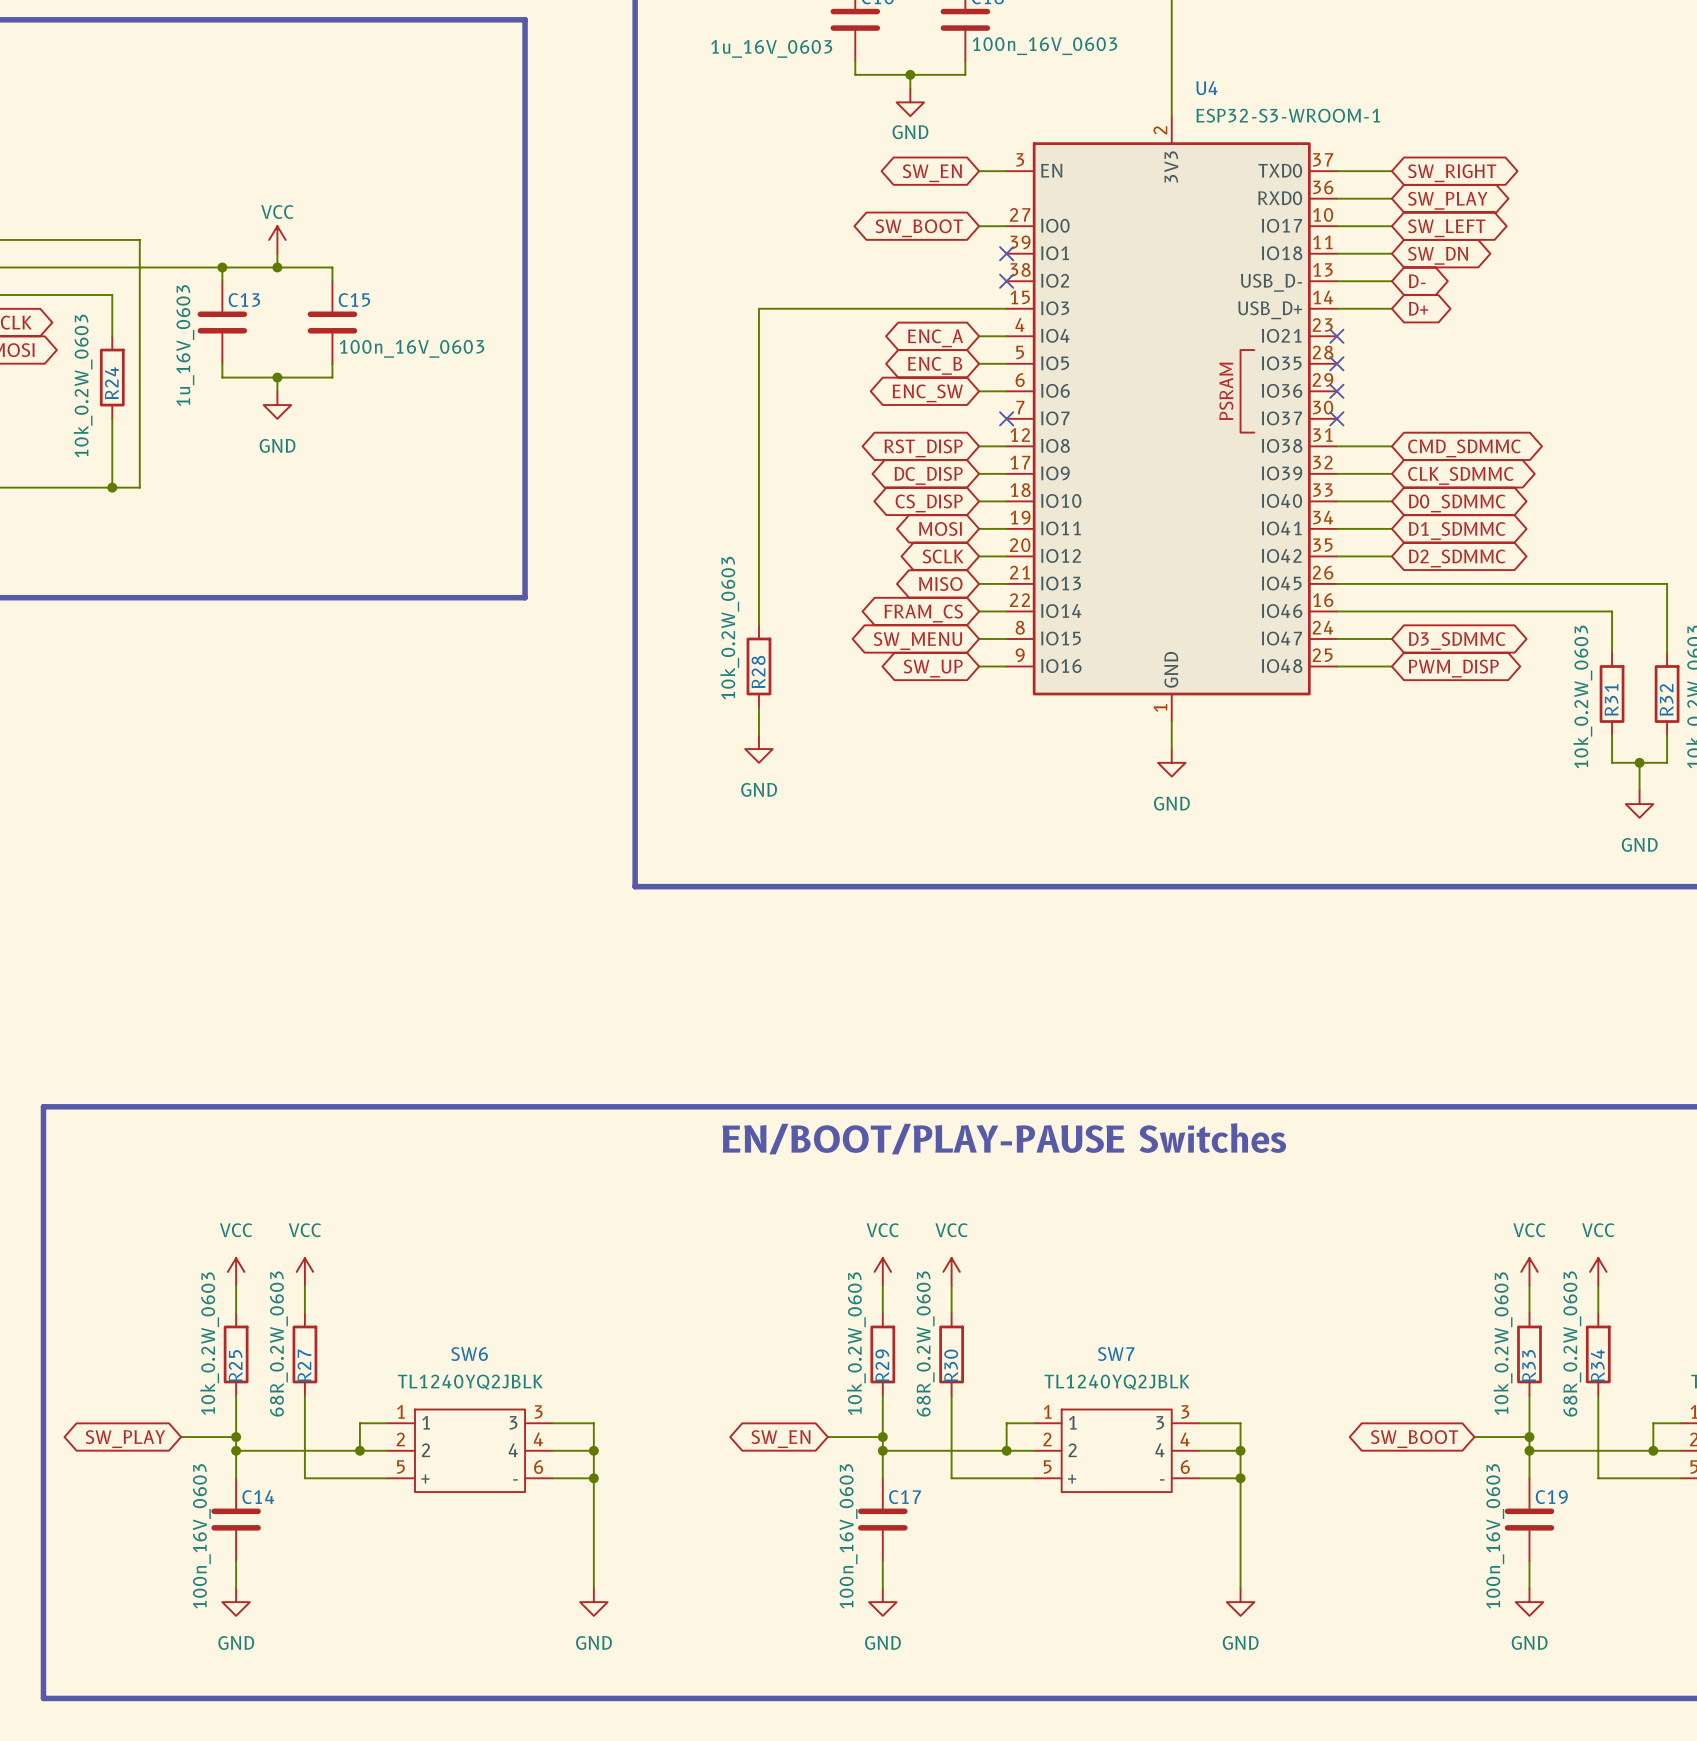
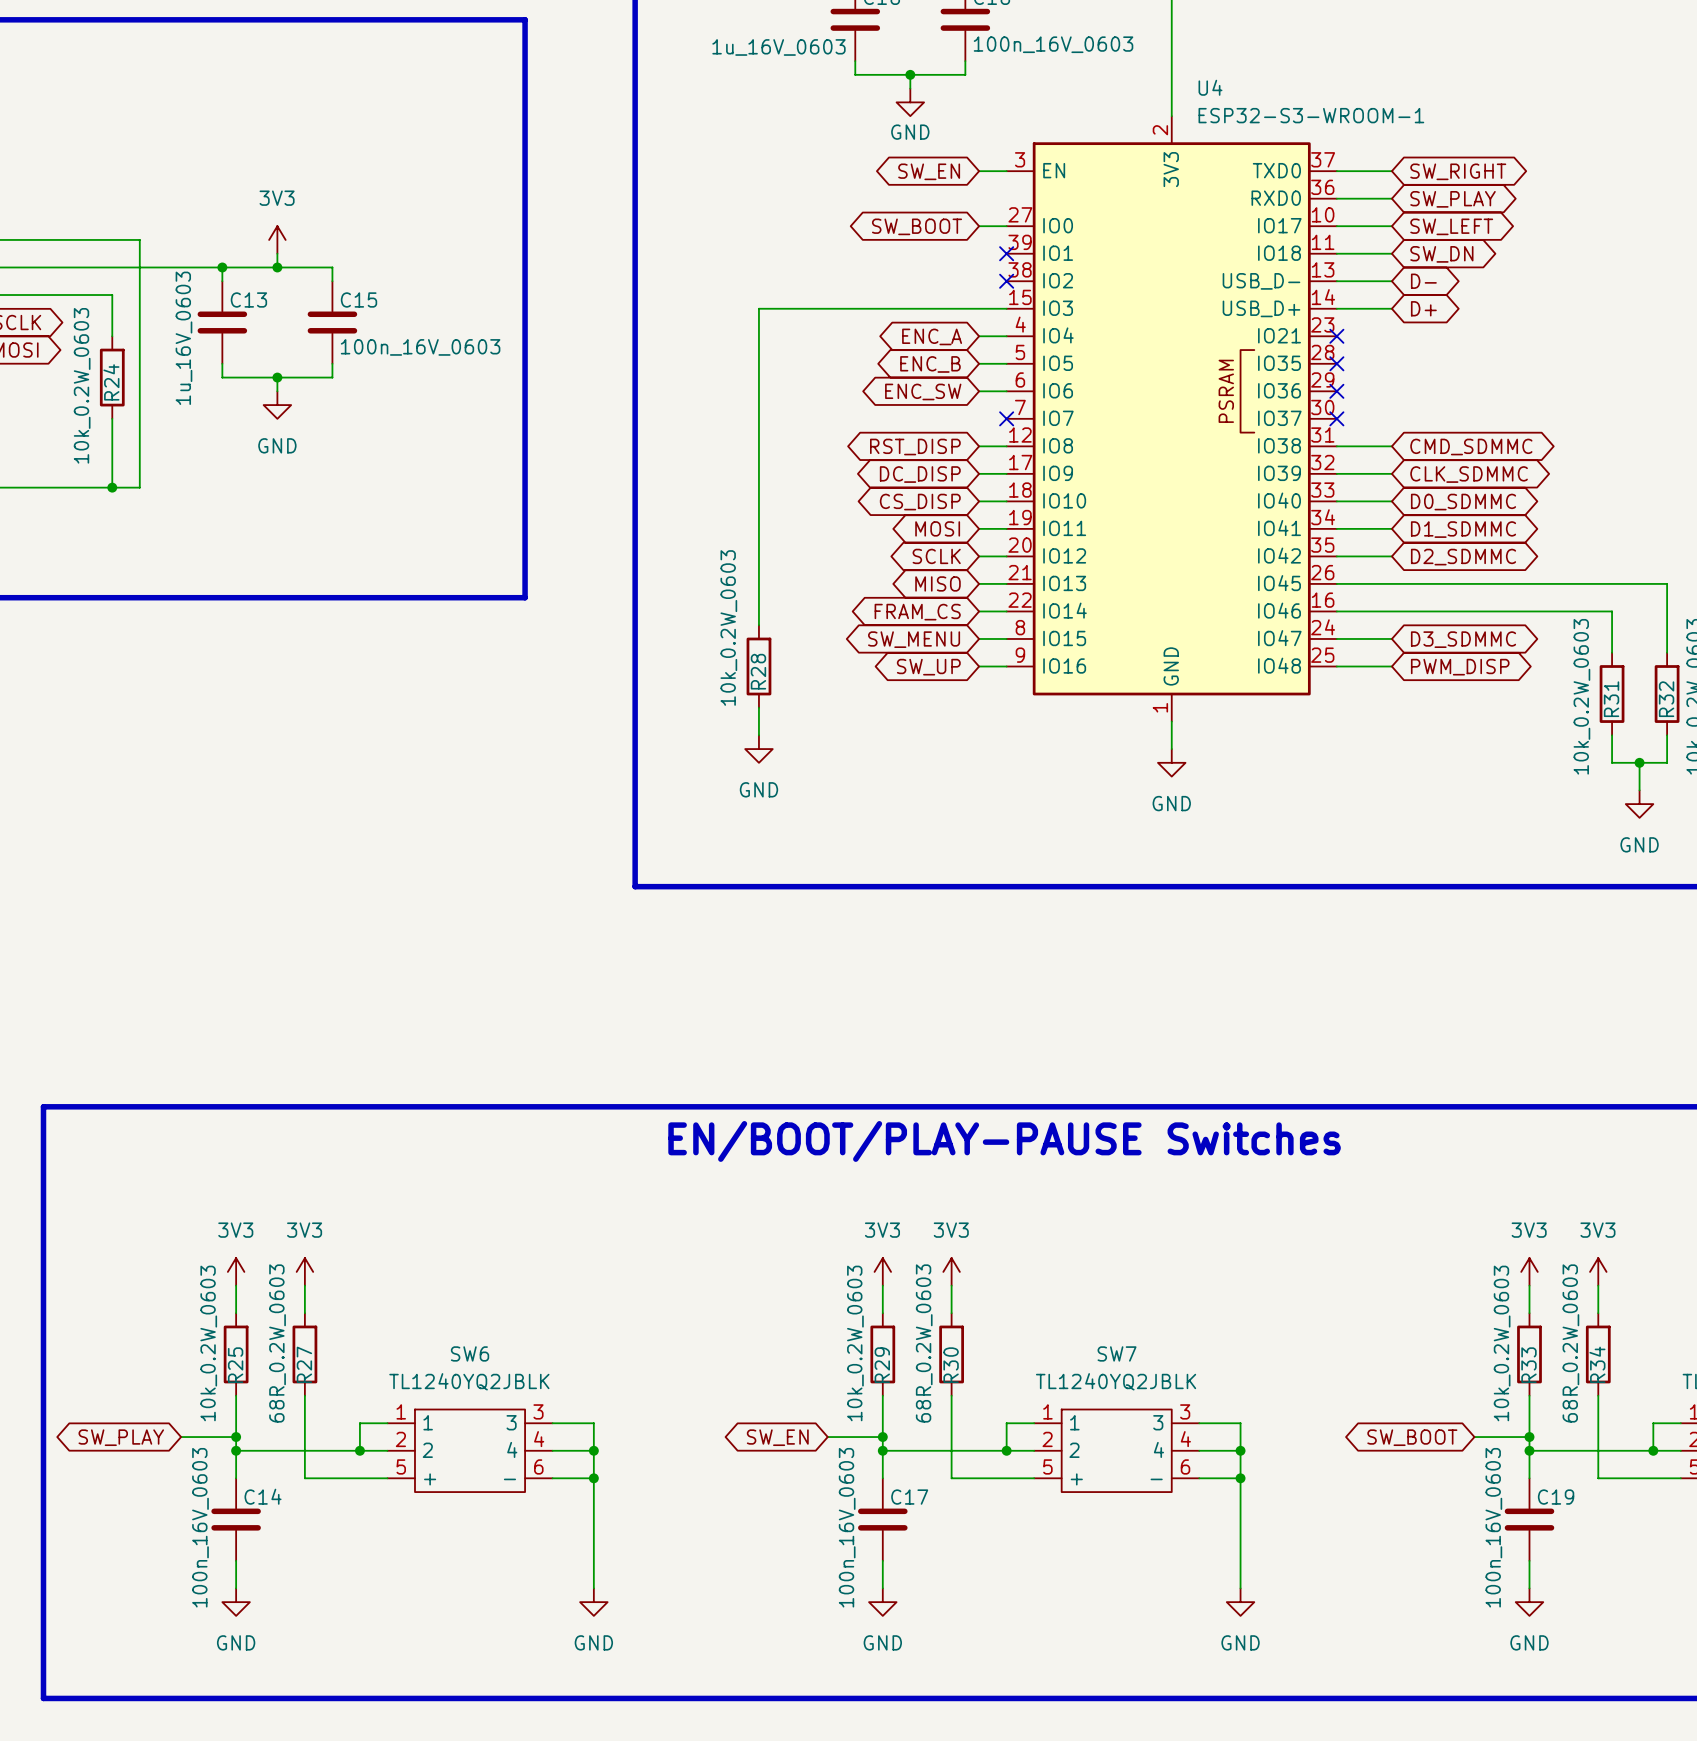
power symbol: VCC (277, 239) -> 3V3 (277, 239)
power symbol: VCC (236, 1271) -> 3V3 (236, 1271)
power symbol: VCC (304, 1271) -> 3V3 (304, 1271)
power symbol: VCC (882, 1271) -> 3V3 (882, 1271)
power symbol: VCC (951, 1271) -> 3V3 (951, 1271)
power symbol: VCC (1529, 1271) -> 3V3 (1529, 1271)
power symbol: VCC (1598, 1271) -> 3V3 (1598, 1271)

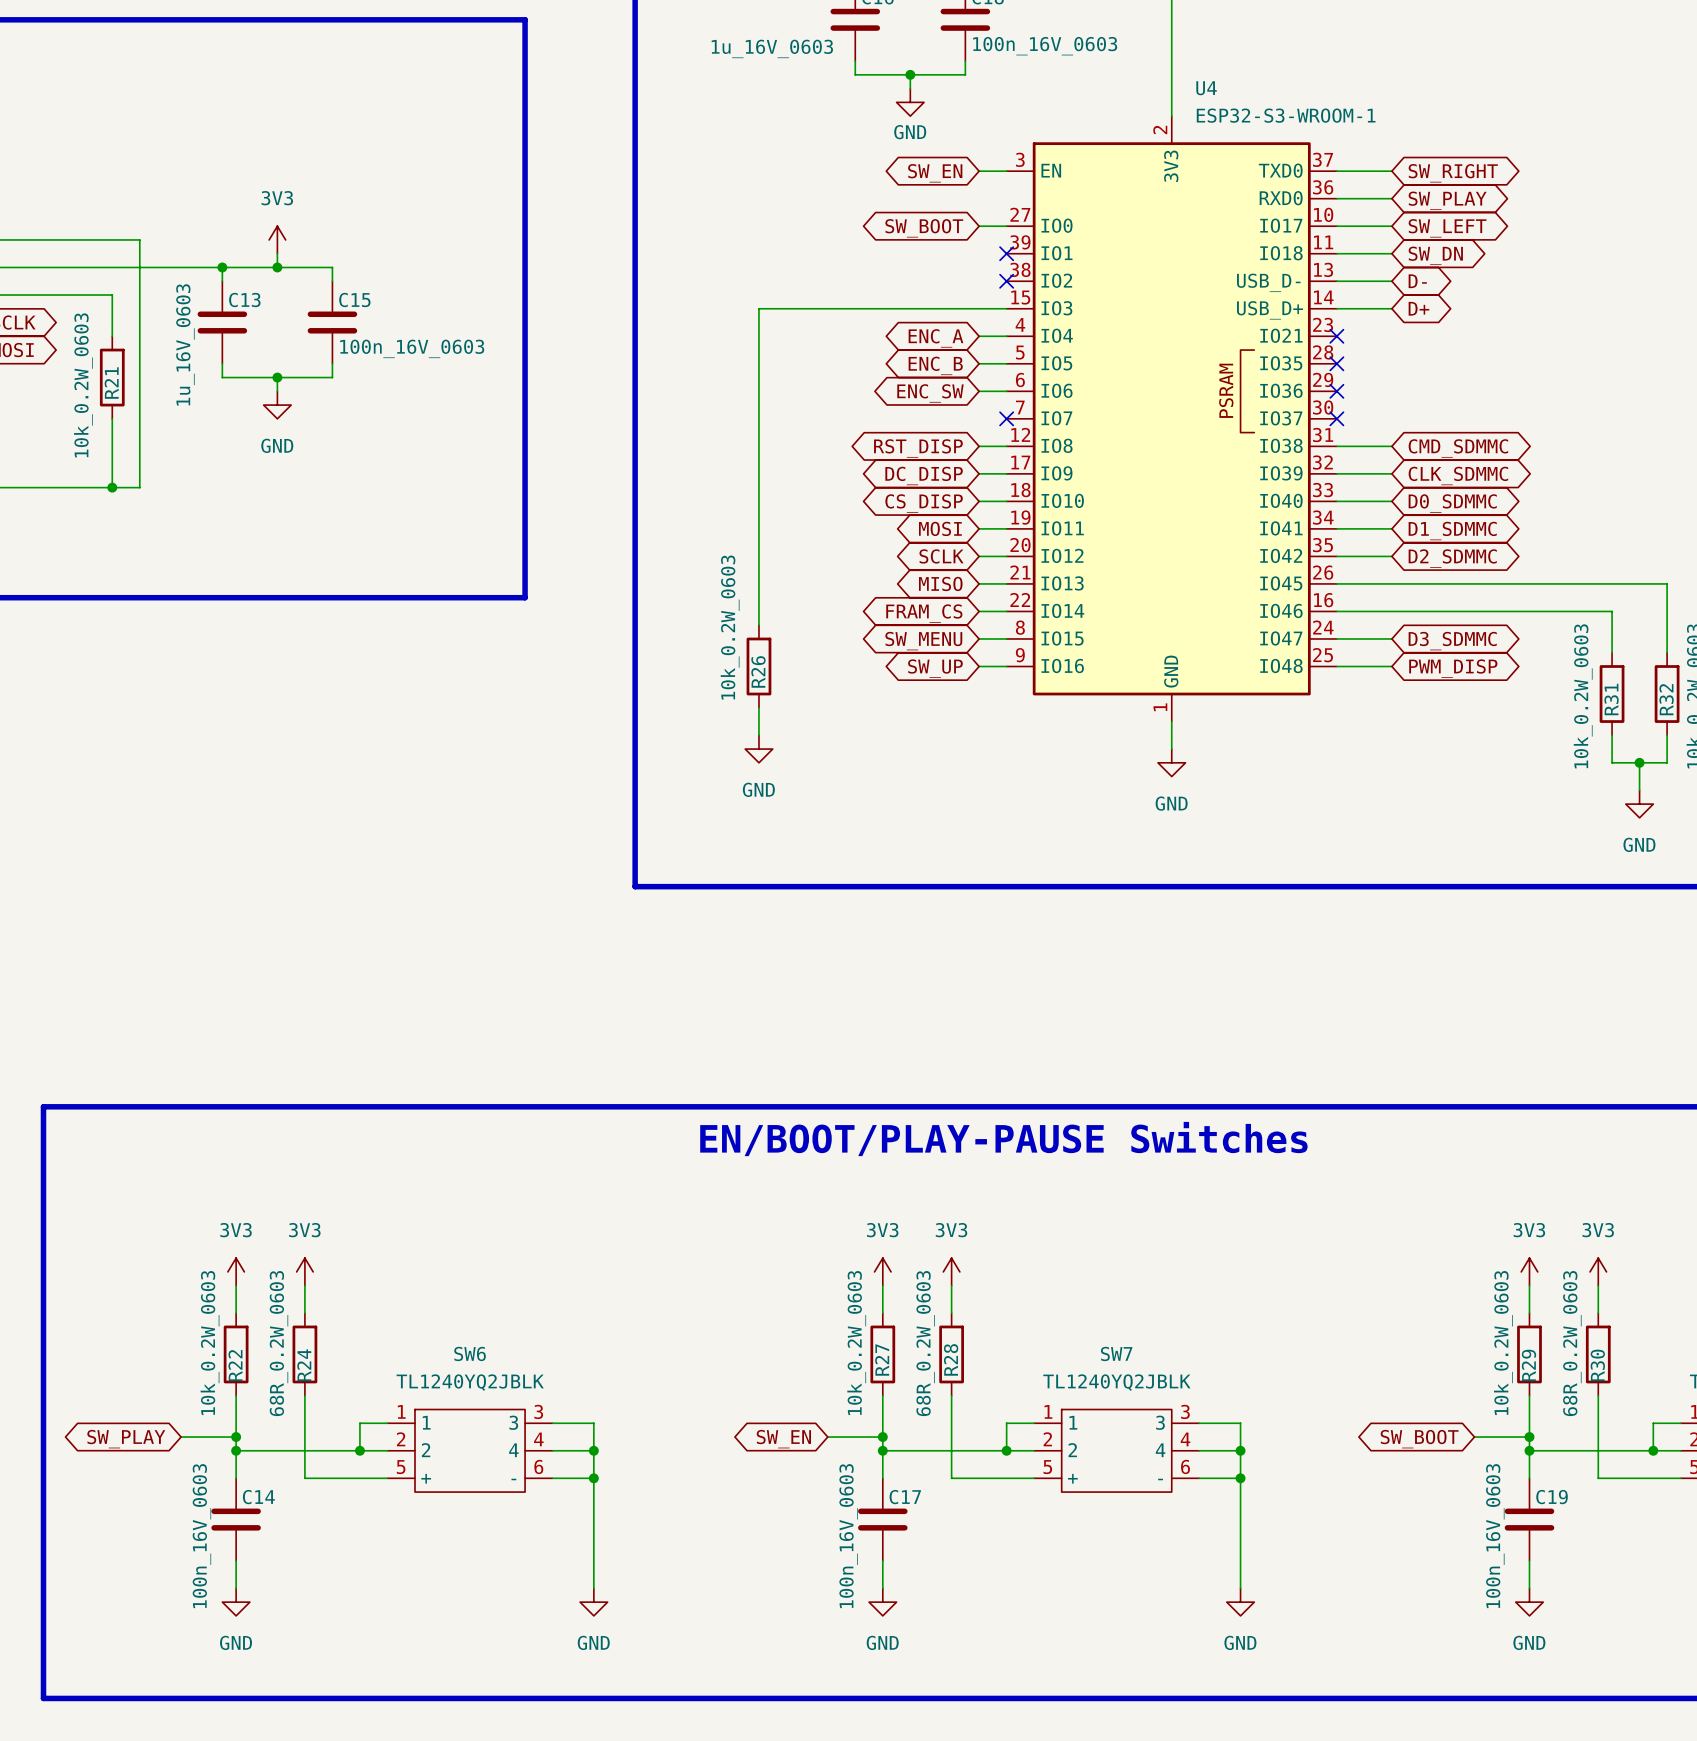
R24 name: R24 (111, 382) -> R21 (111, 383)
R28 name: R28 (758, 671) -> R26 (758, 671)
R27 name: R27 (304, 1364) -> R24 (304, 1365)
R34 name: R34 (1597, 1364) -> R30 (1597, 1365)
R25 name: R25 (235, 1365) -> R22 (235, 1365)
R29 name: R29 (882, 1365) -> R27 (882, 1360)
R30 name: R30 (951, 1365) -> R28 (951, 1359)
R33 name: R33 (1528, 1365) -> R29 (1528, 1365)

